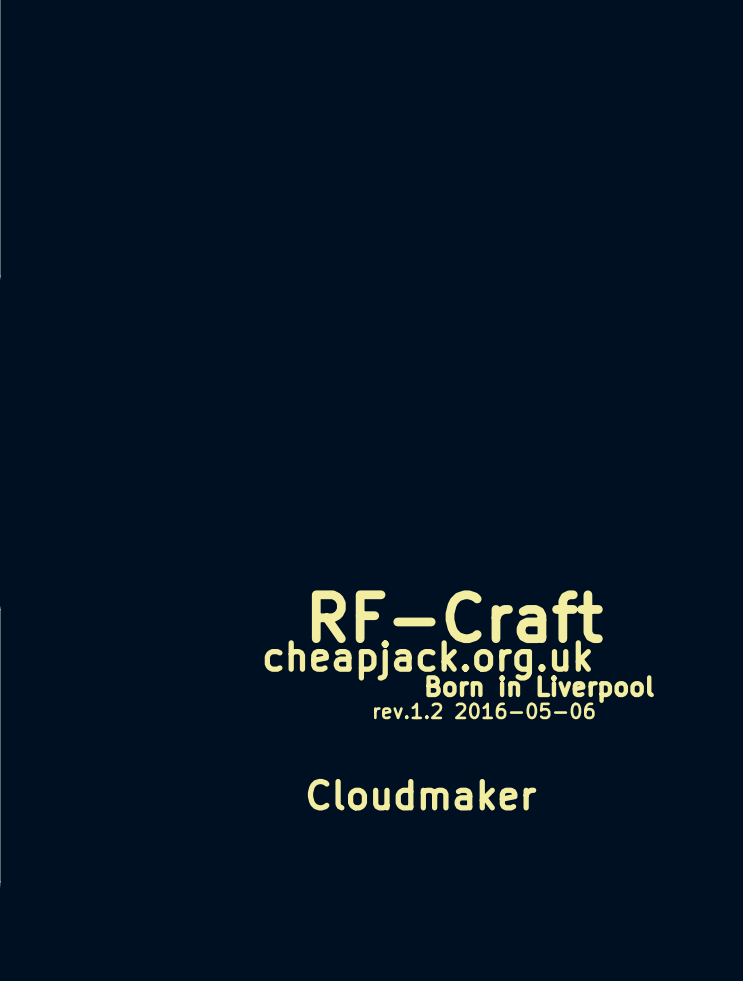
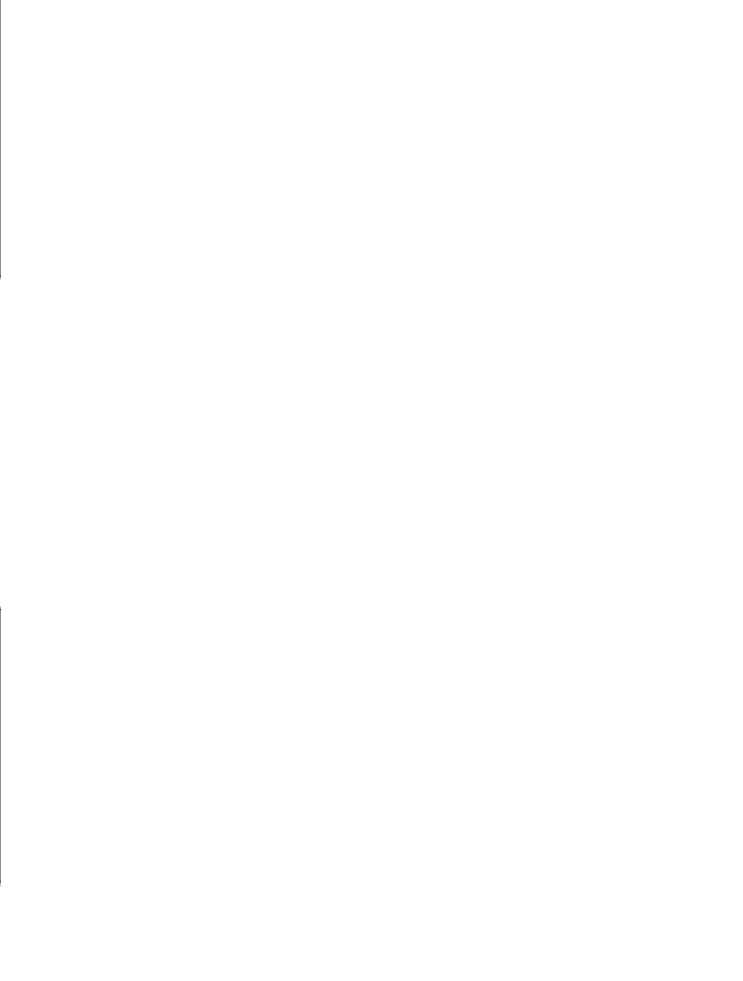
text: RF-Craft (457, 616) -> none
text: cheapjack.org.uk (427, 660) -> none
text: Born in Liverpool (540, 689) -> none
text: rev.1.2 2016-05-06 (484, 710) -> none
text: Cloudmaker (422, 794) -> none

